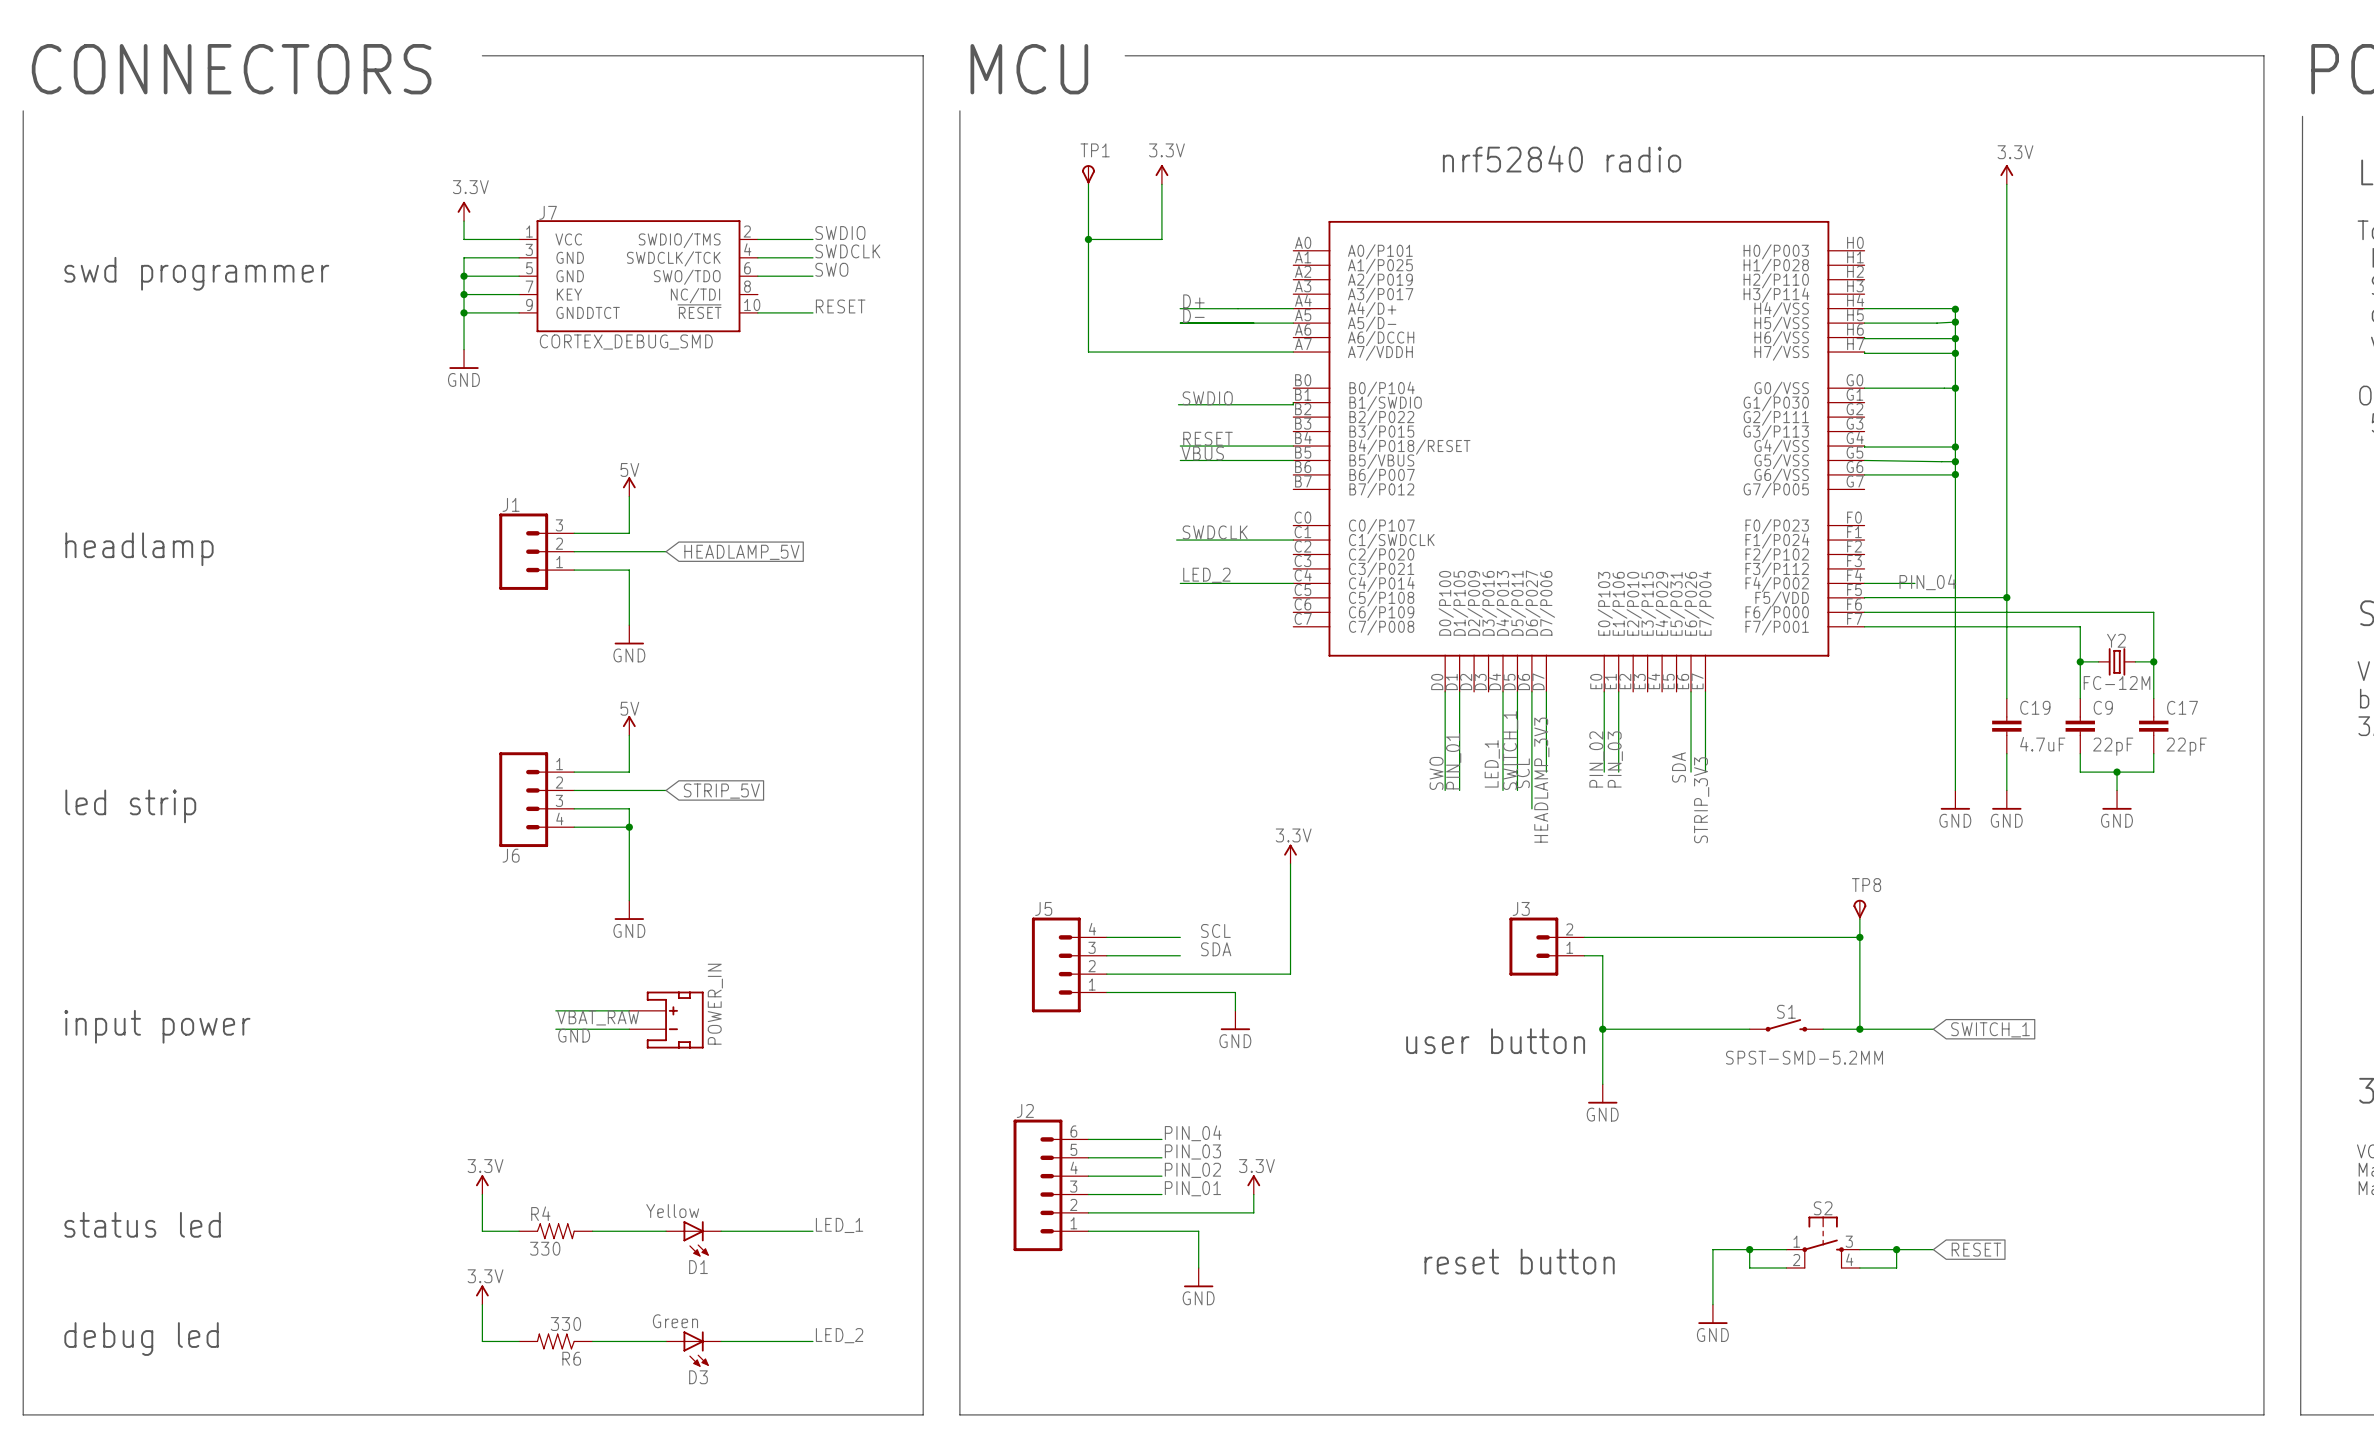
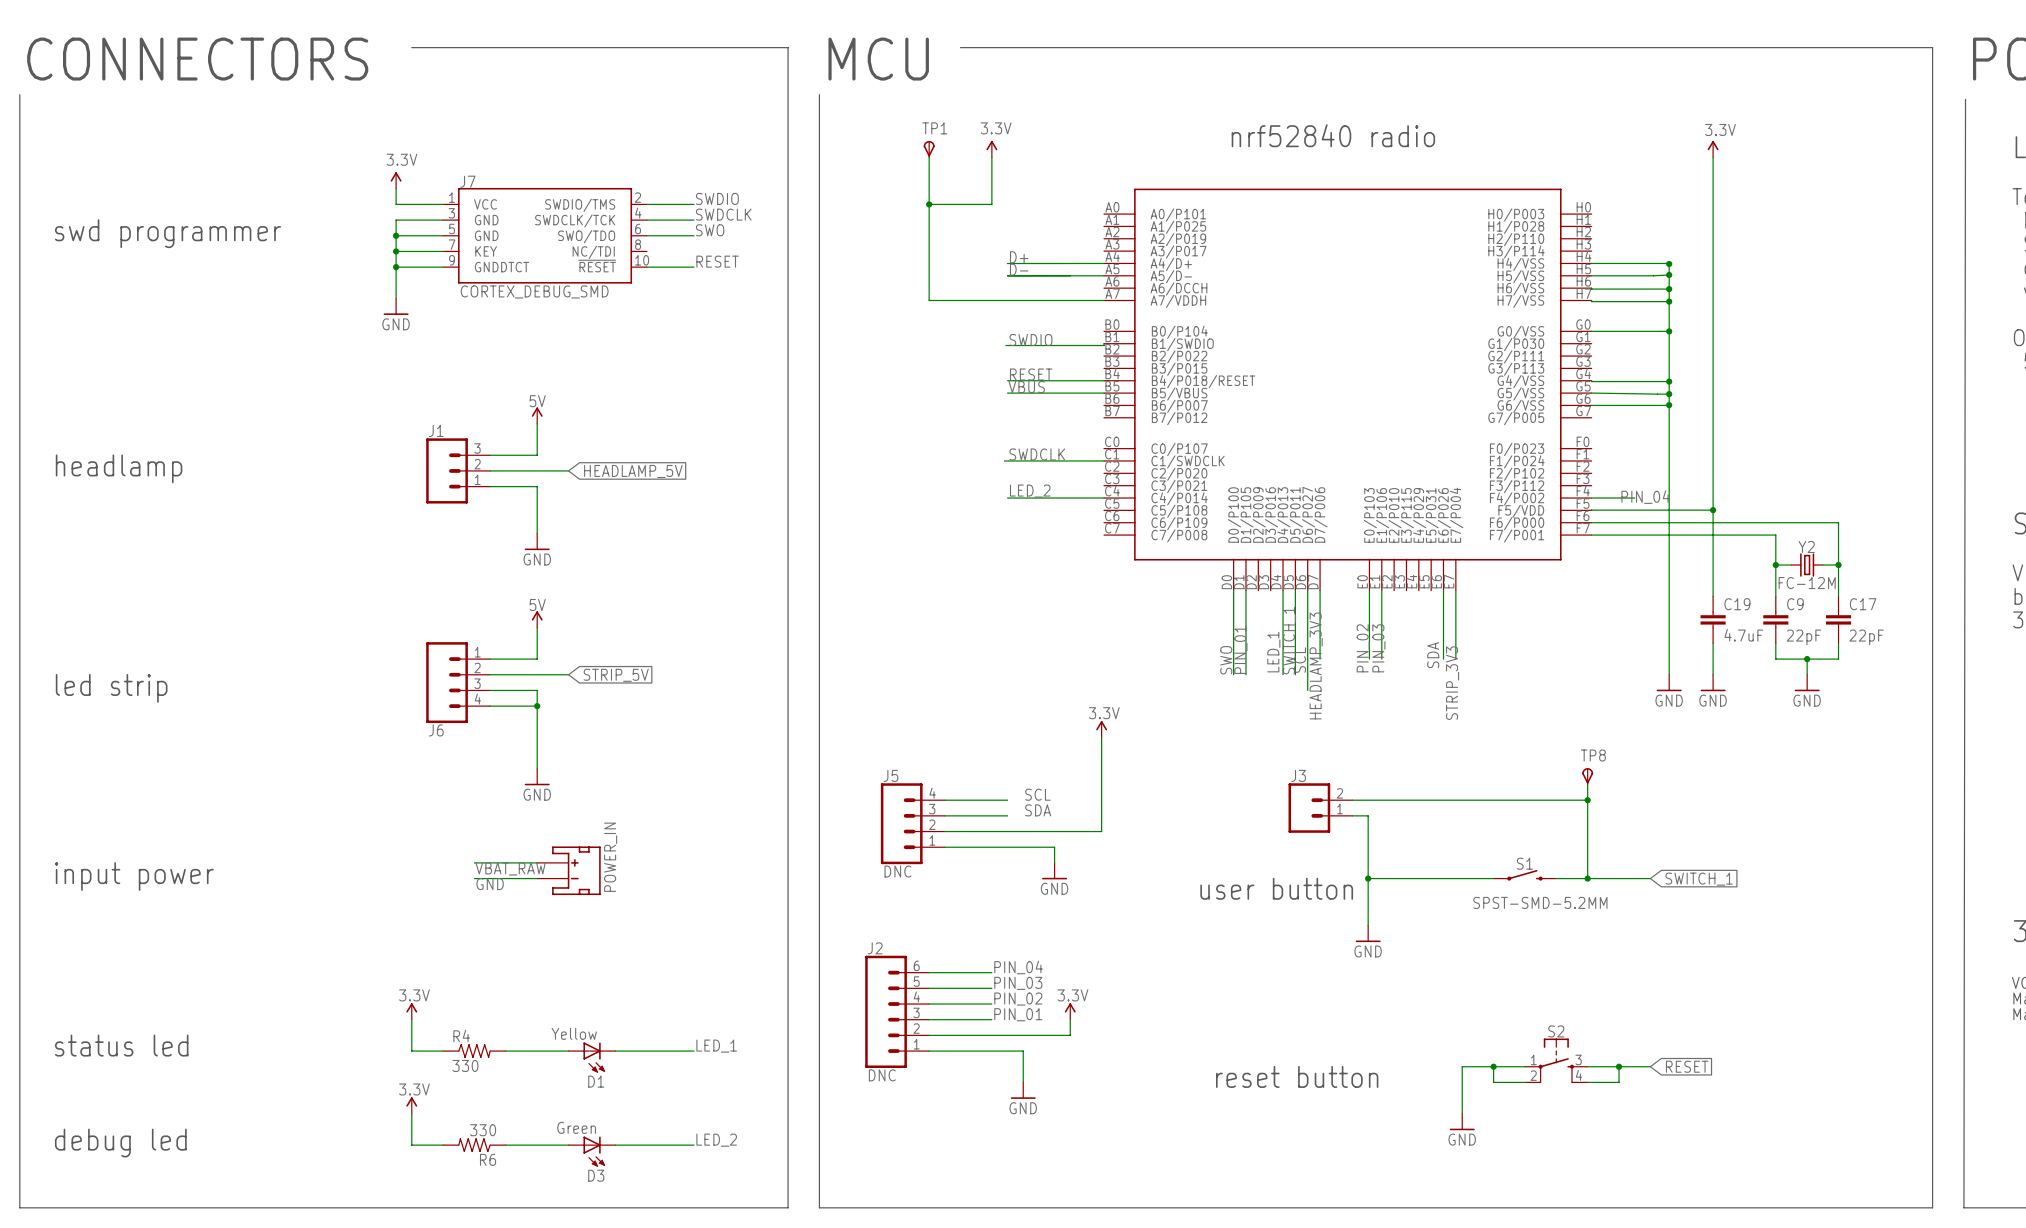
J5 value: none -> DNC (897, 871)
J2 value: none -> DNC (882, 1075)

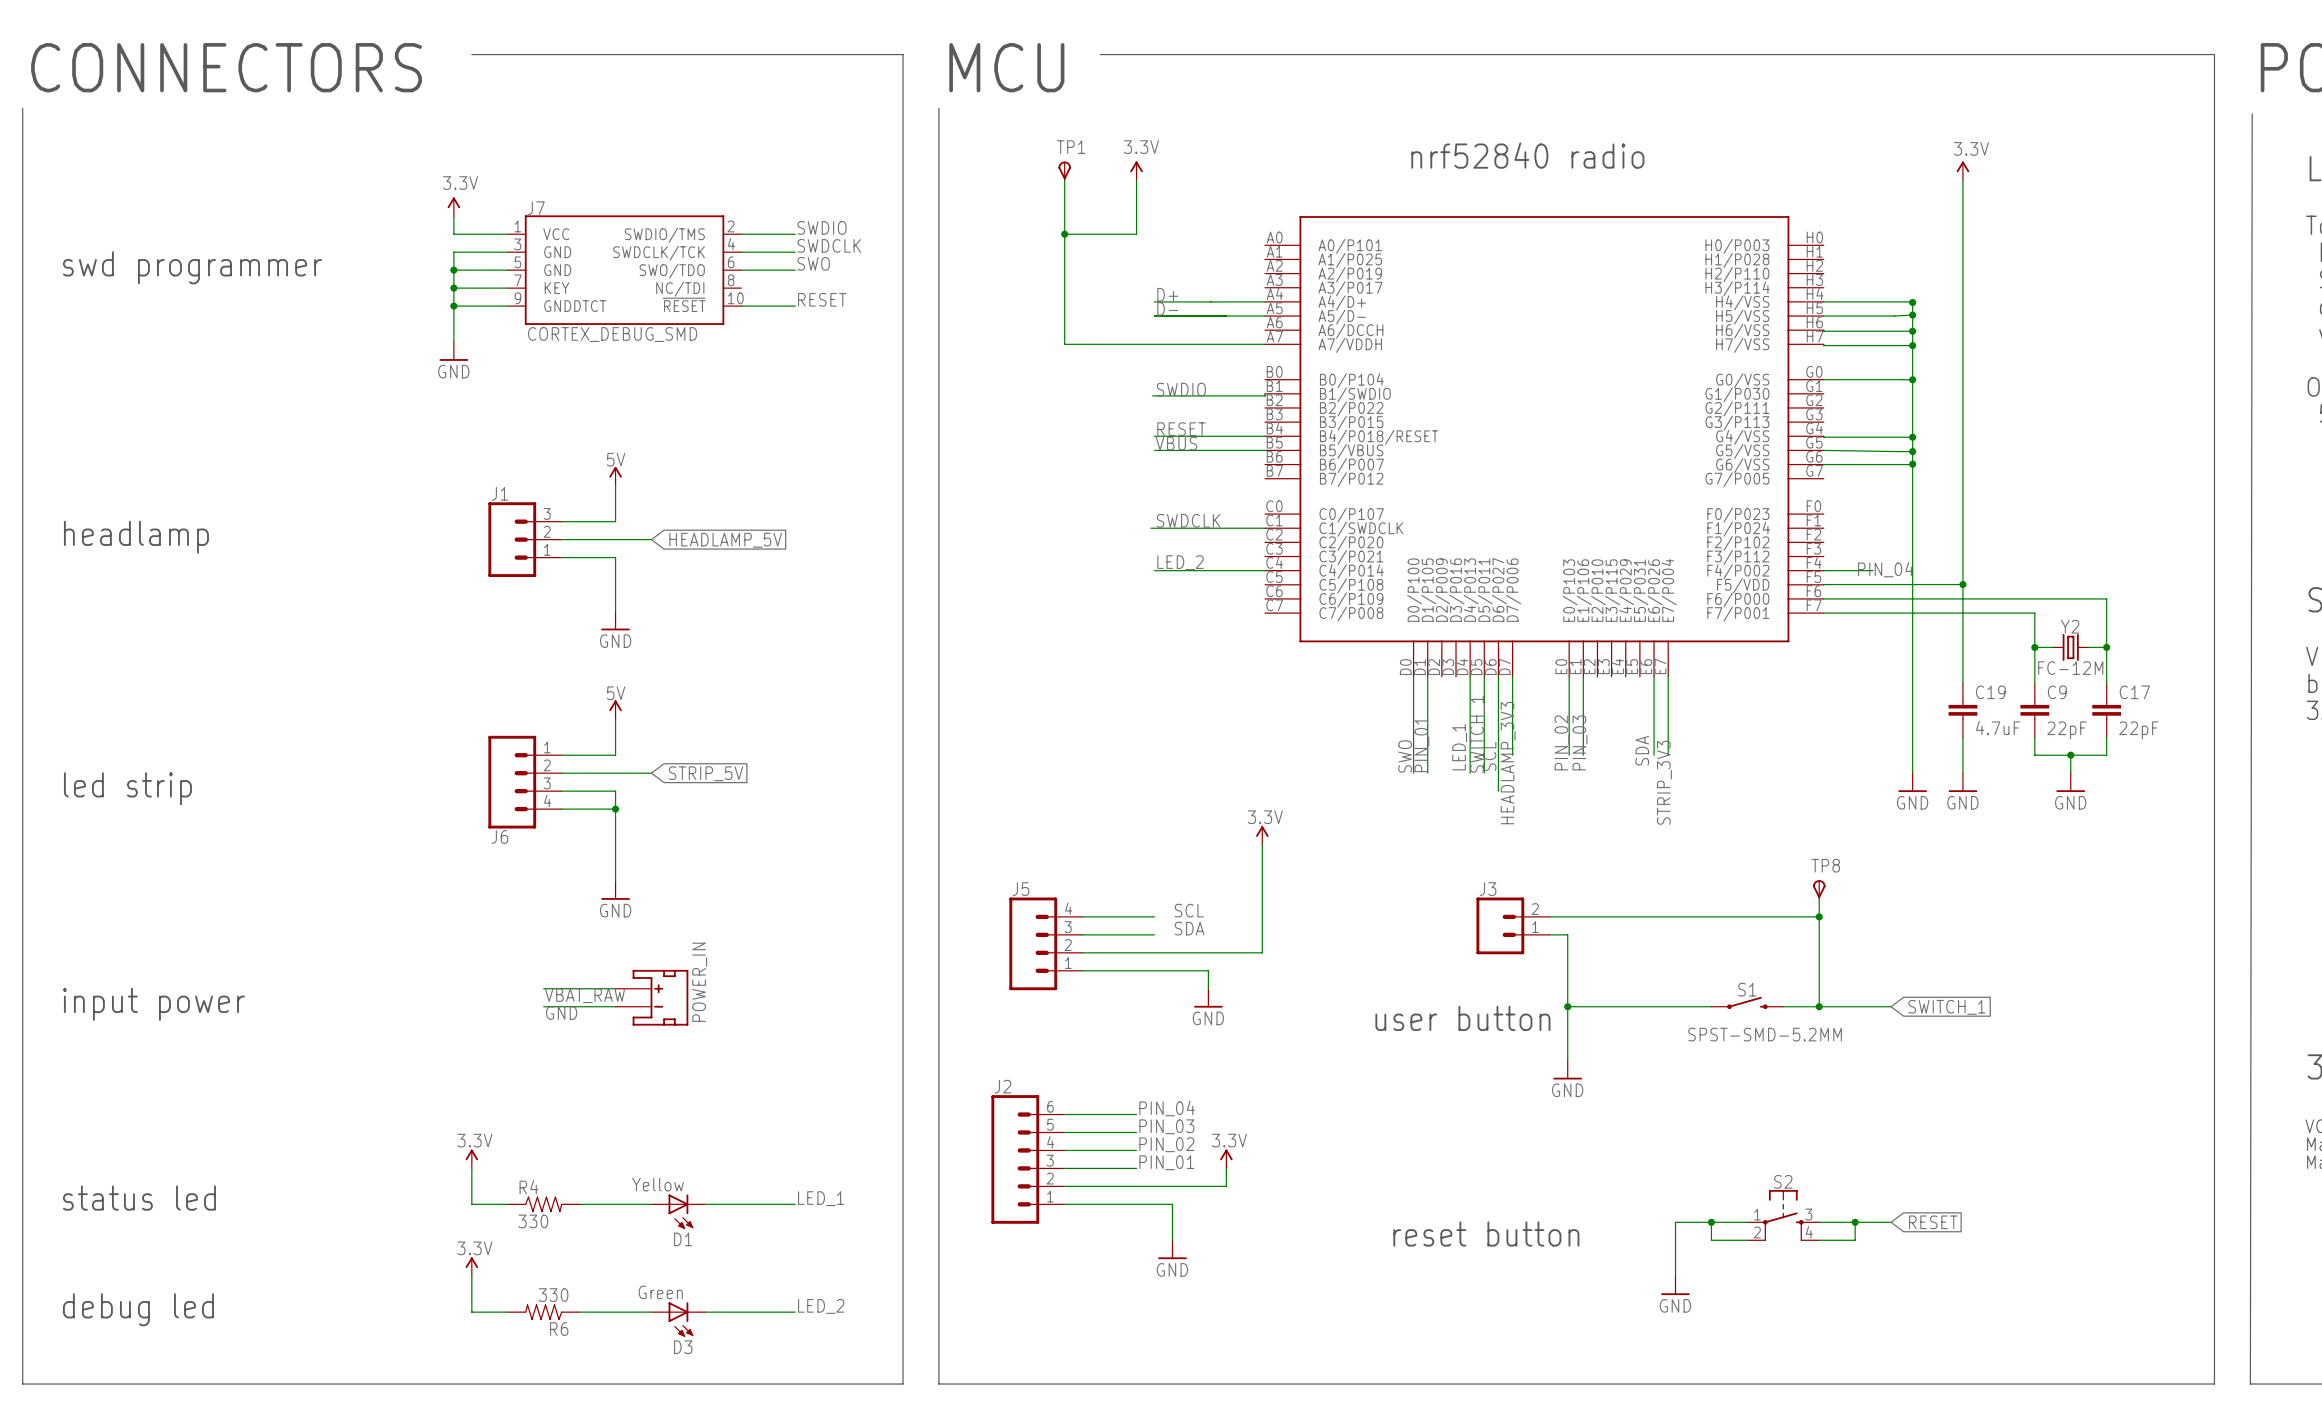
J5 value: DNC (897, 871) -> none
J2 value: DNC (882, 1075) -> none

